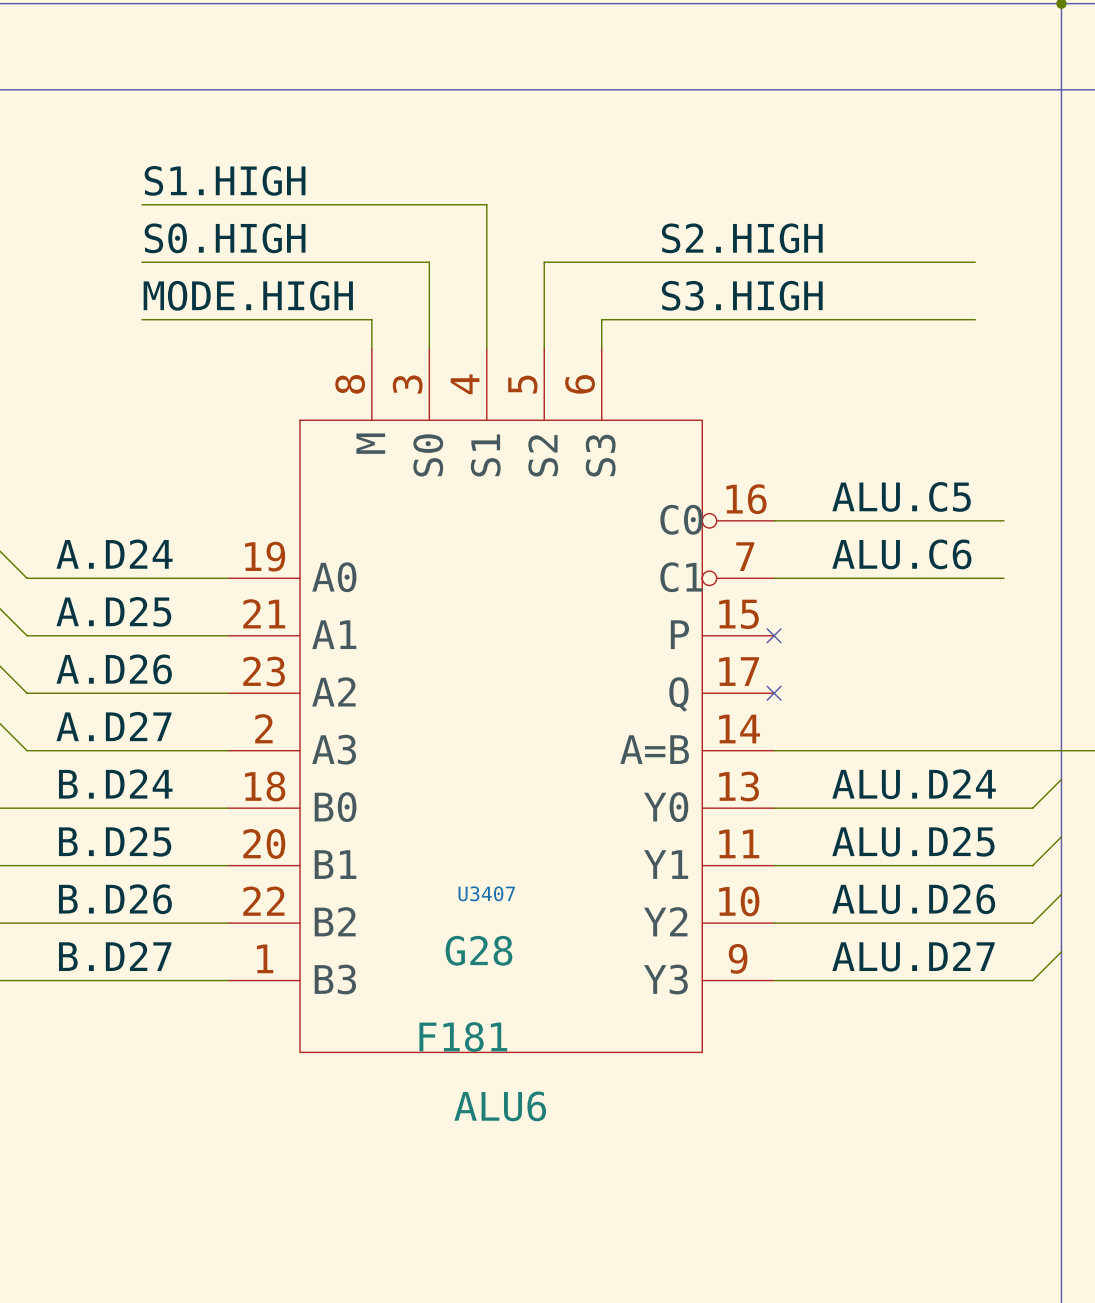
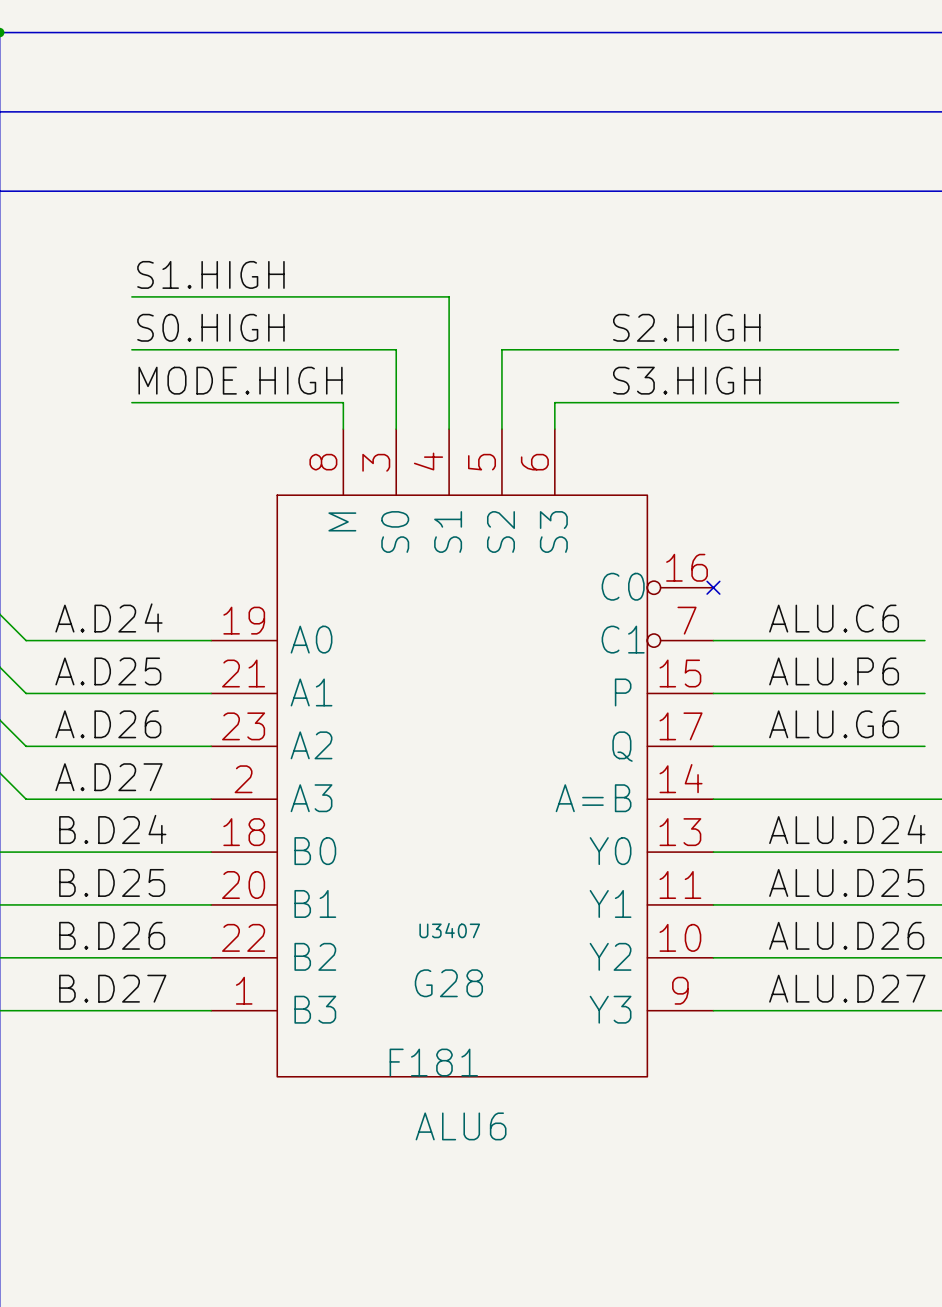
label: ALU.C5 (901, 496) -> none
wire: (774, 520) (1003, 520) -> (713, 693) (924, 693)
no-connect mark: none -> (713, 587)
label: none -> ALU.P6 (834, 671)
no-connect mark: (774, 635) -> none
label: none -> ALU.G6 (834, 724)
wire: none -> (713, 746) (924, 746)
no-connect mark: (774, 693) -> none

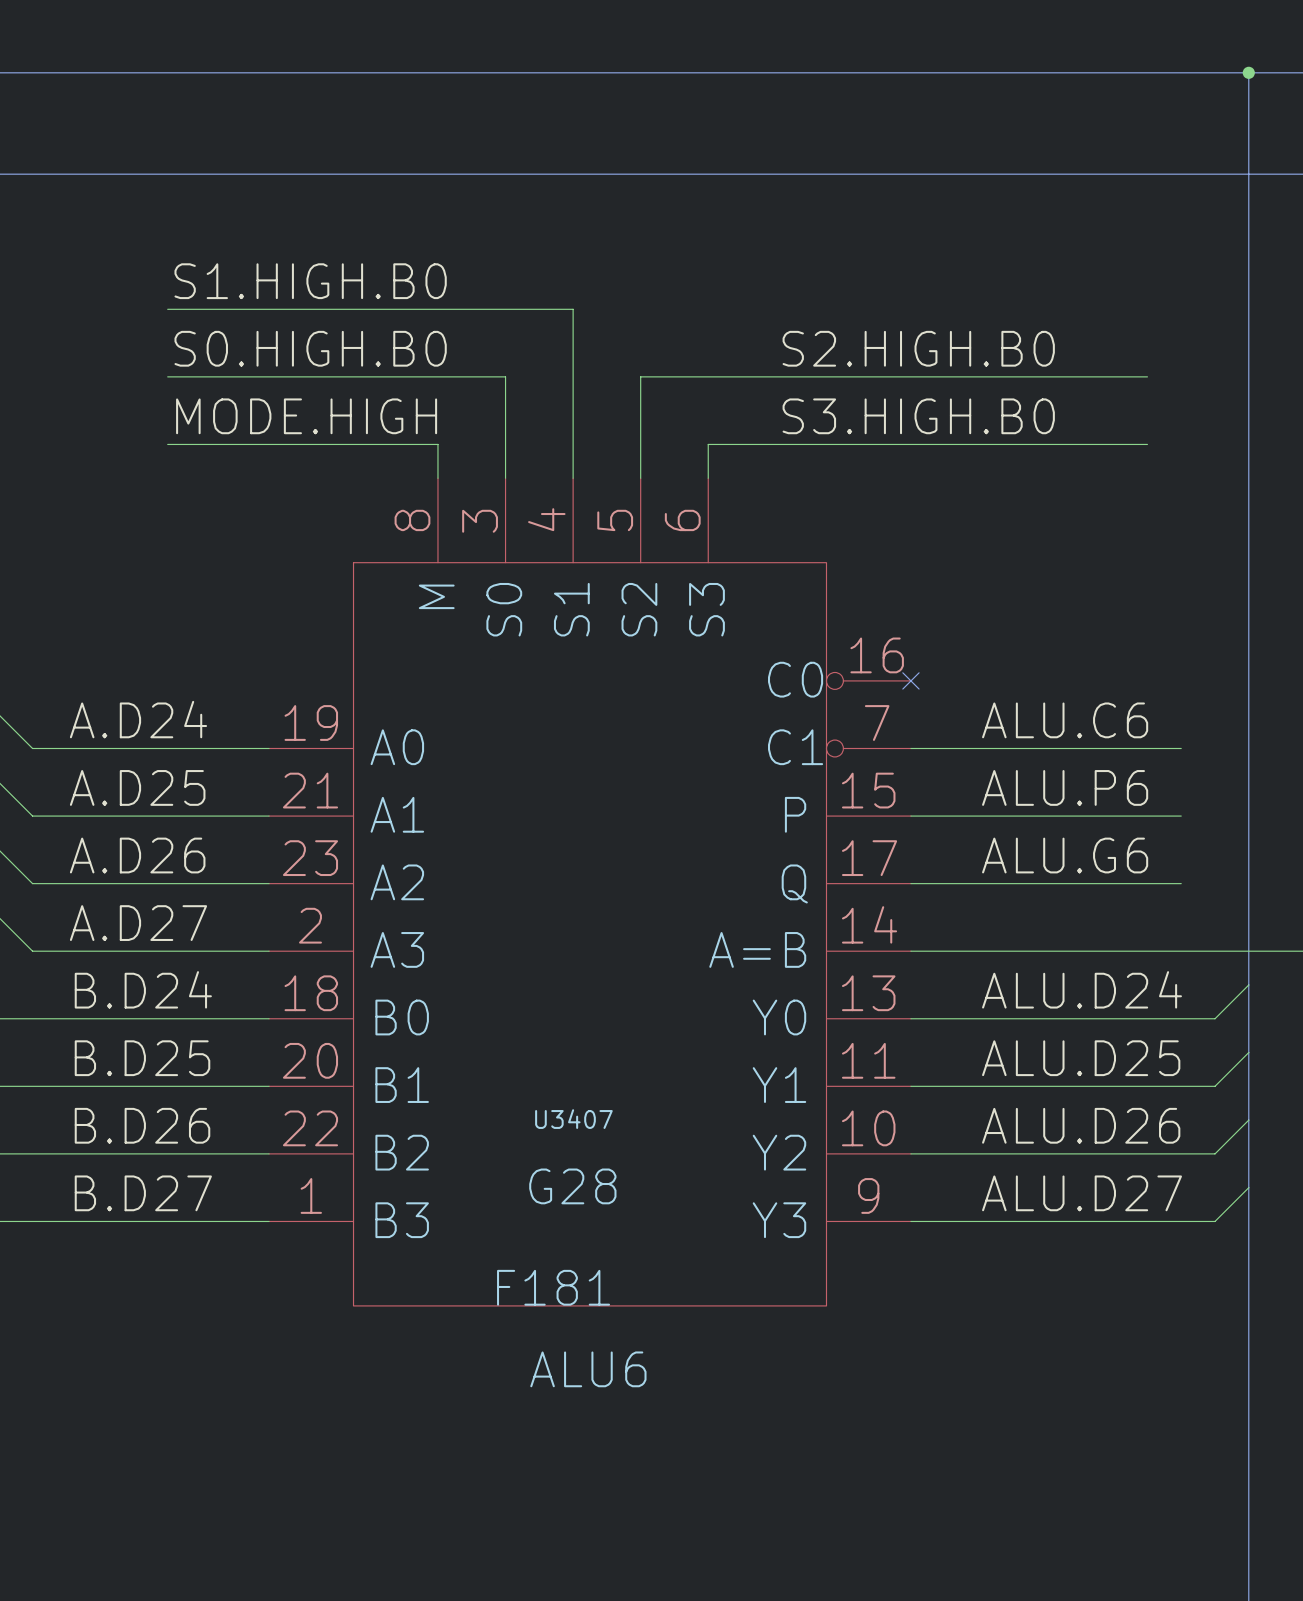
label: S1.HIGH (210, 274) -> S1.HIGH.B0 (310, 281)
label: S0.HIGH (210, 327) -> S0.HIGH.B0 (310, 348)
label: S2.HIGH (686, 327) -> S2.HIGH.B0 (918, 348)
label: S3.HIGH (686, 380) -> S3.HIGH.B0 (918, 416)

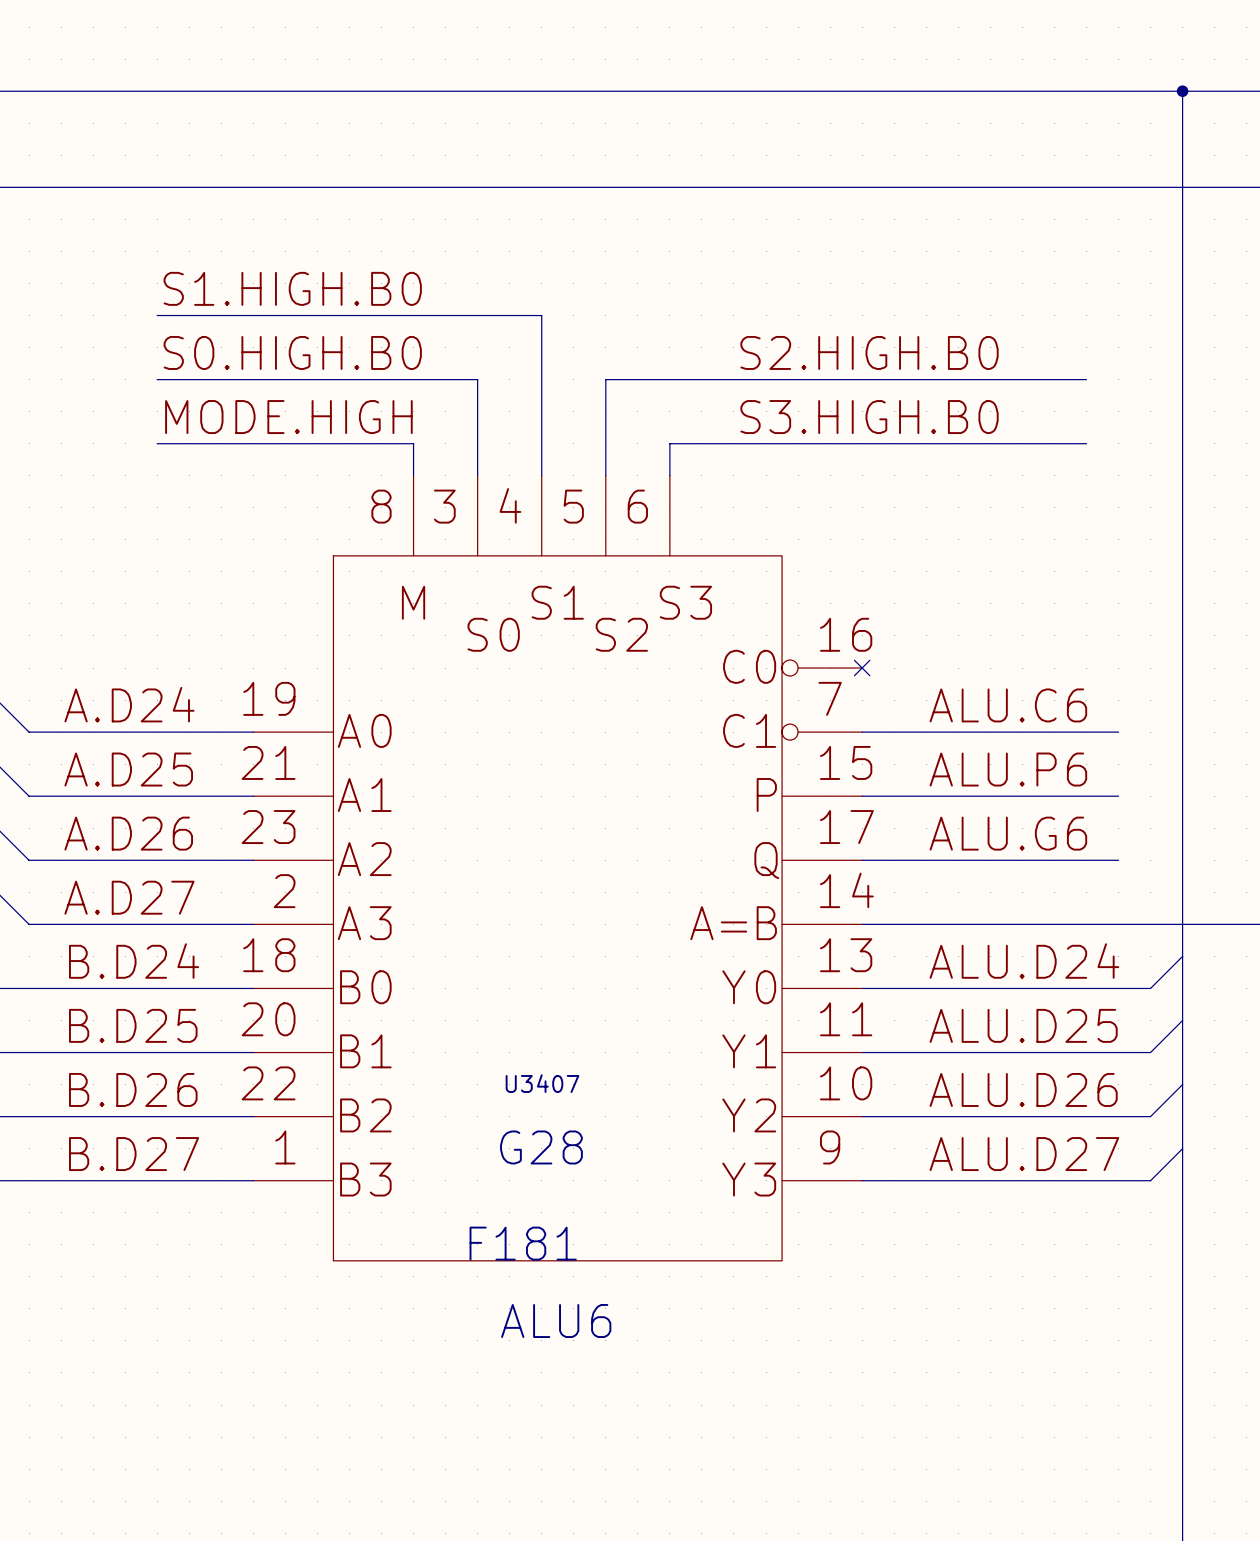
U3407 symbol: [269, 478, 911, 1306] -> [253, 475, 863, 1261]

